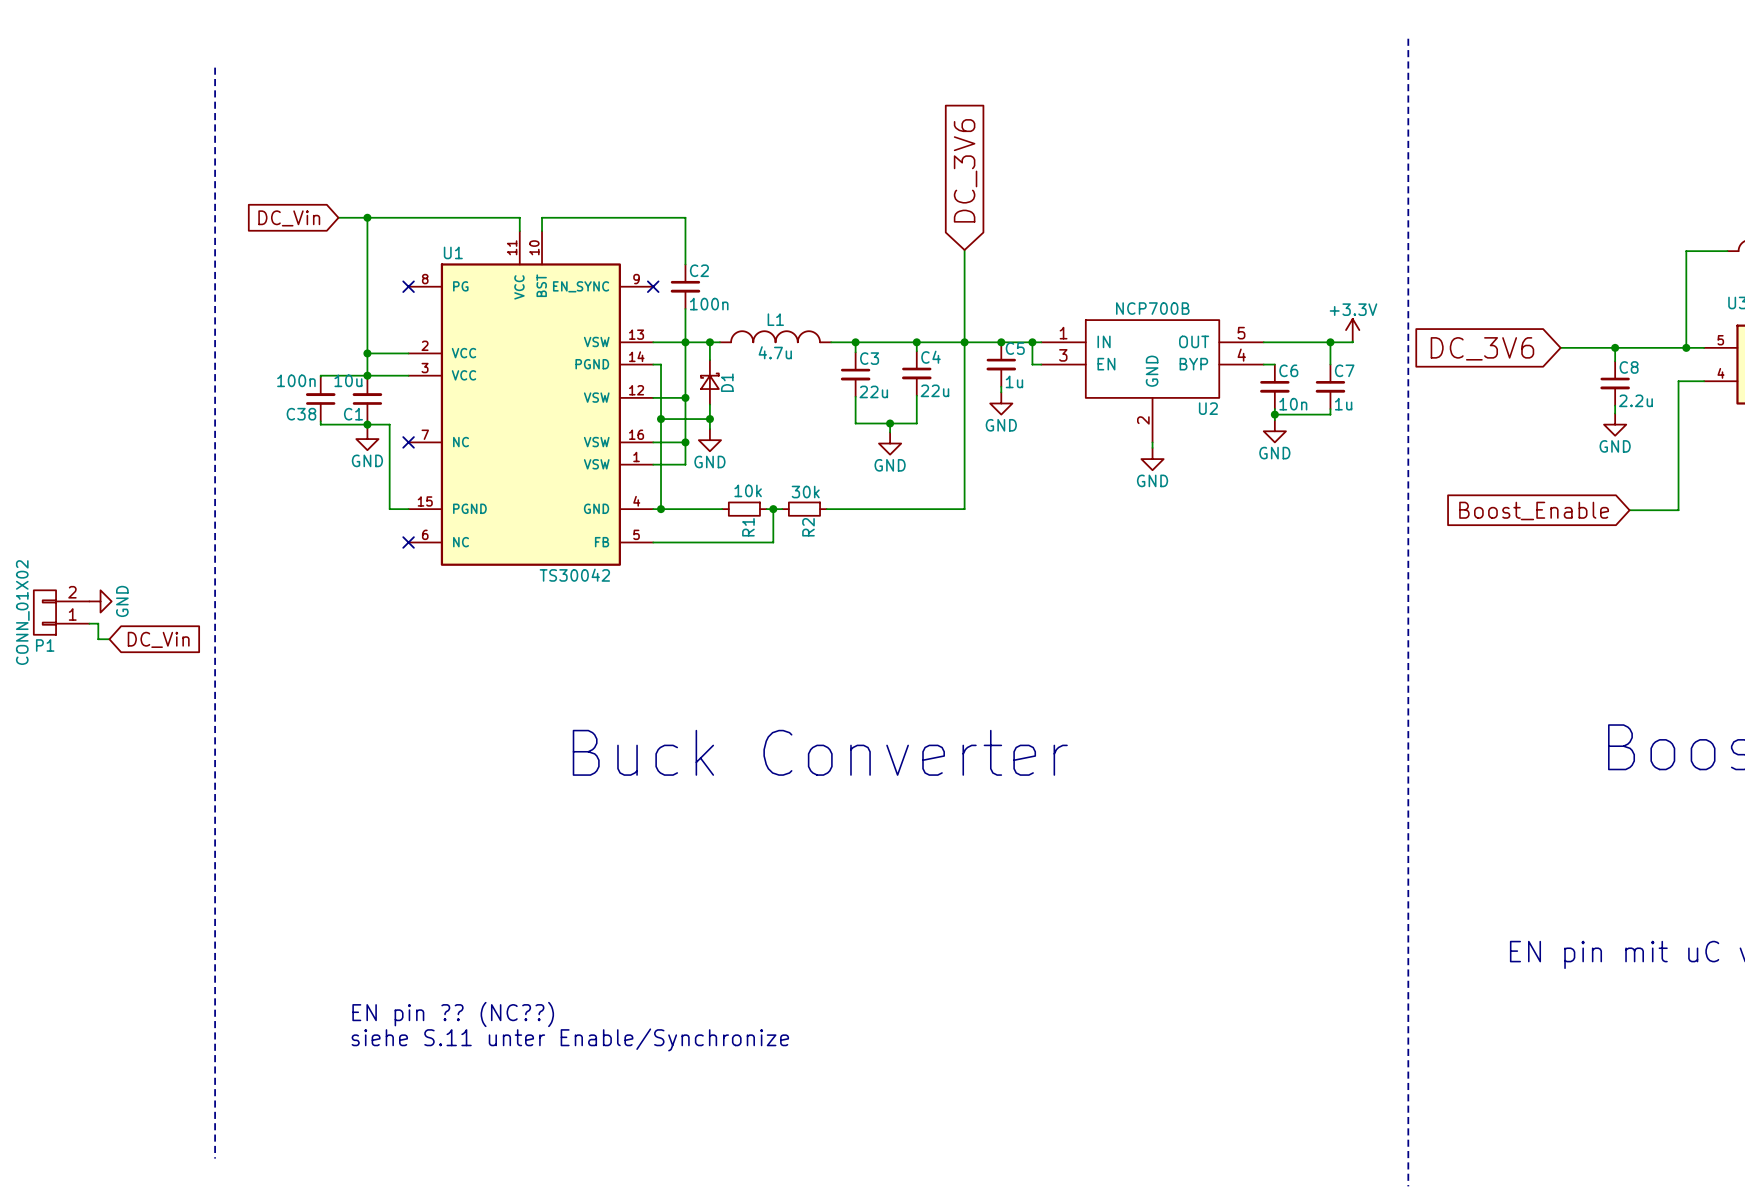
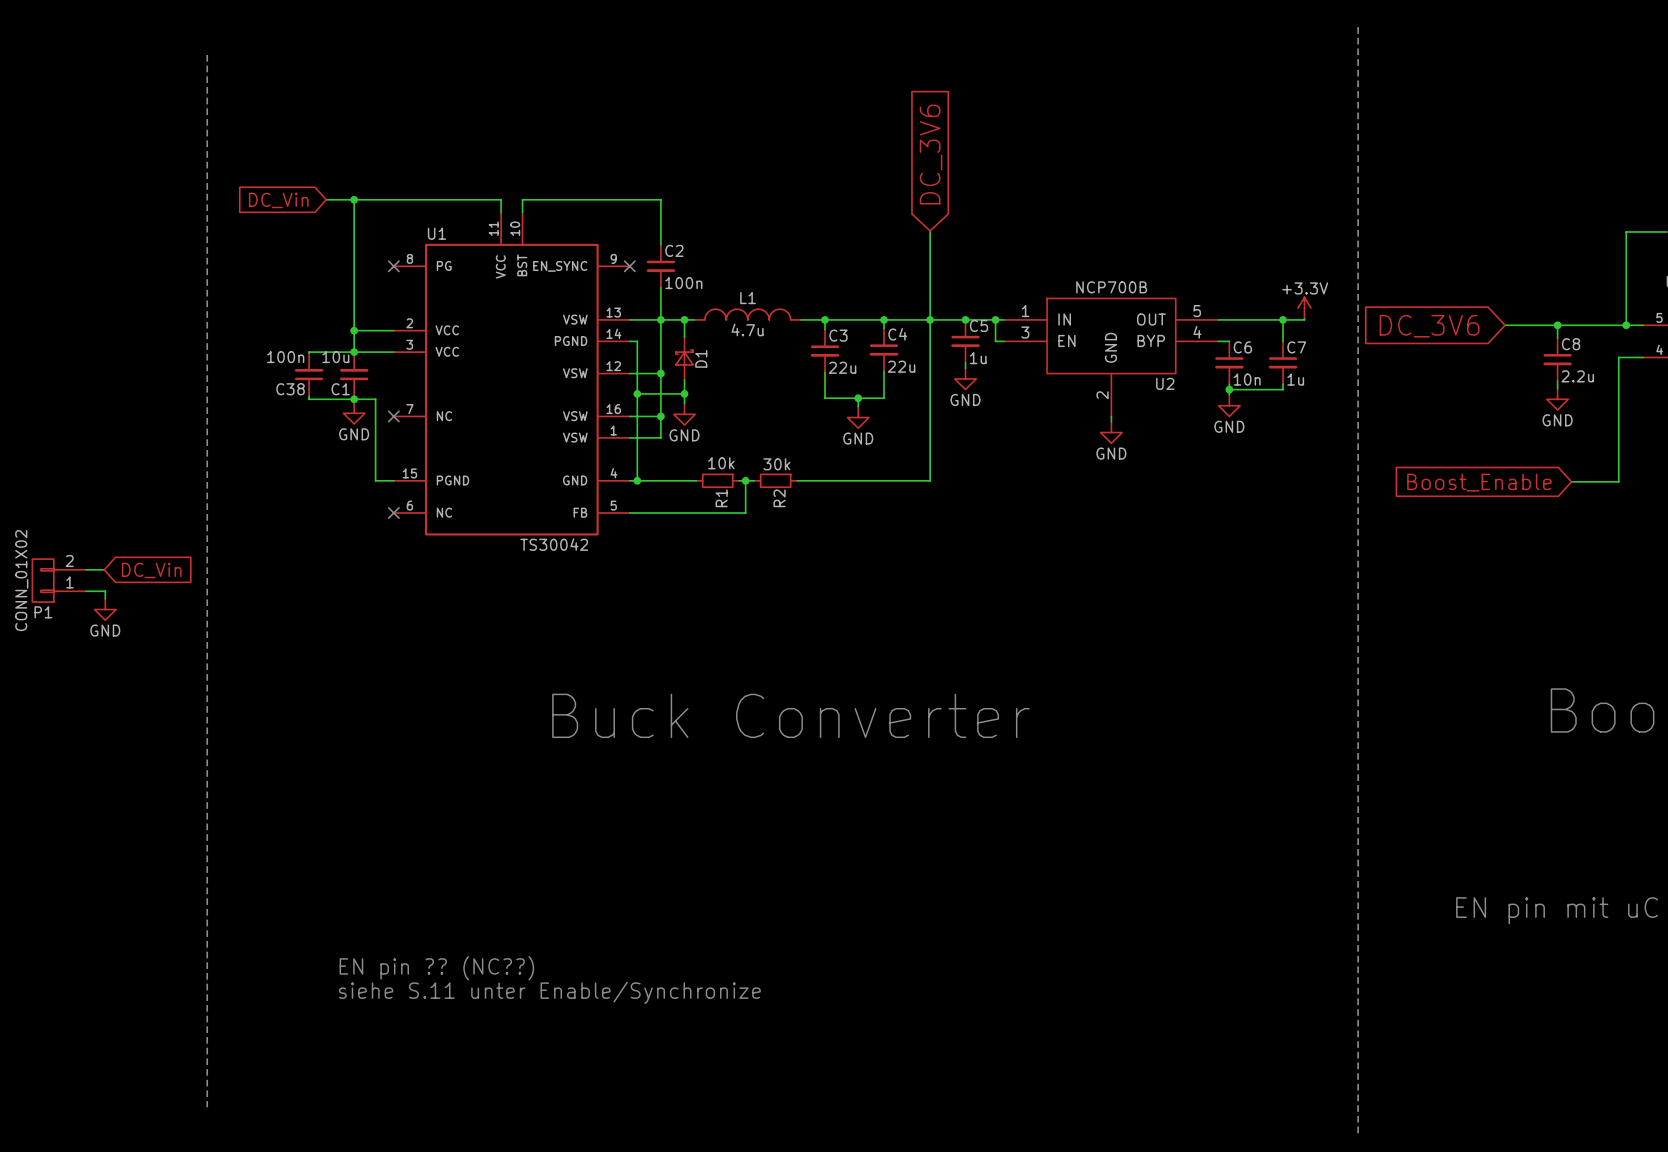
power symbol rotation: 0° (100, 601) -> 90° clockwise (105, 609)
power symbol position: GND (100, 601) -> GND (105, 609)
wire: (98, 623) (98, 639) (109, 639) -> (94, 591) (105, 591) (105, 598)
global label position: DC_Vin (158, 639) -> DC_Vin (151, 570)

